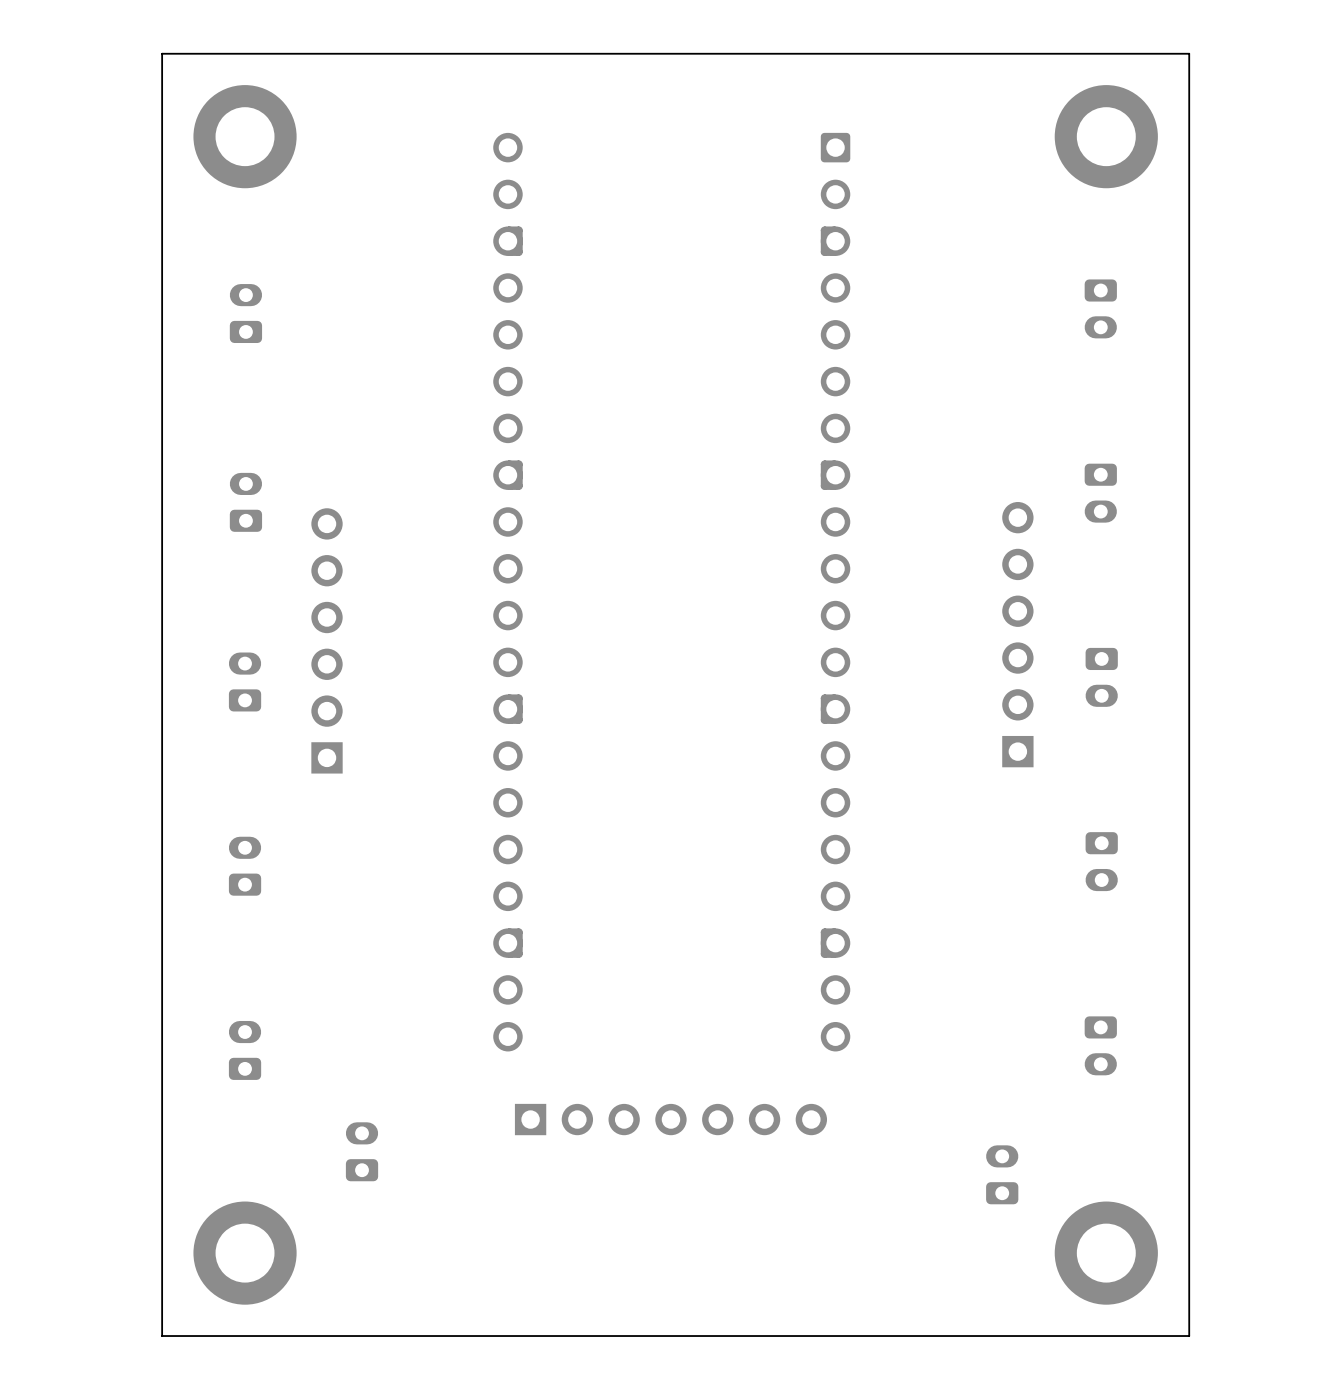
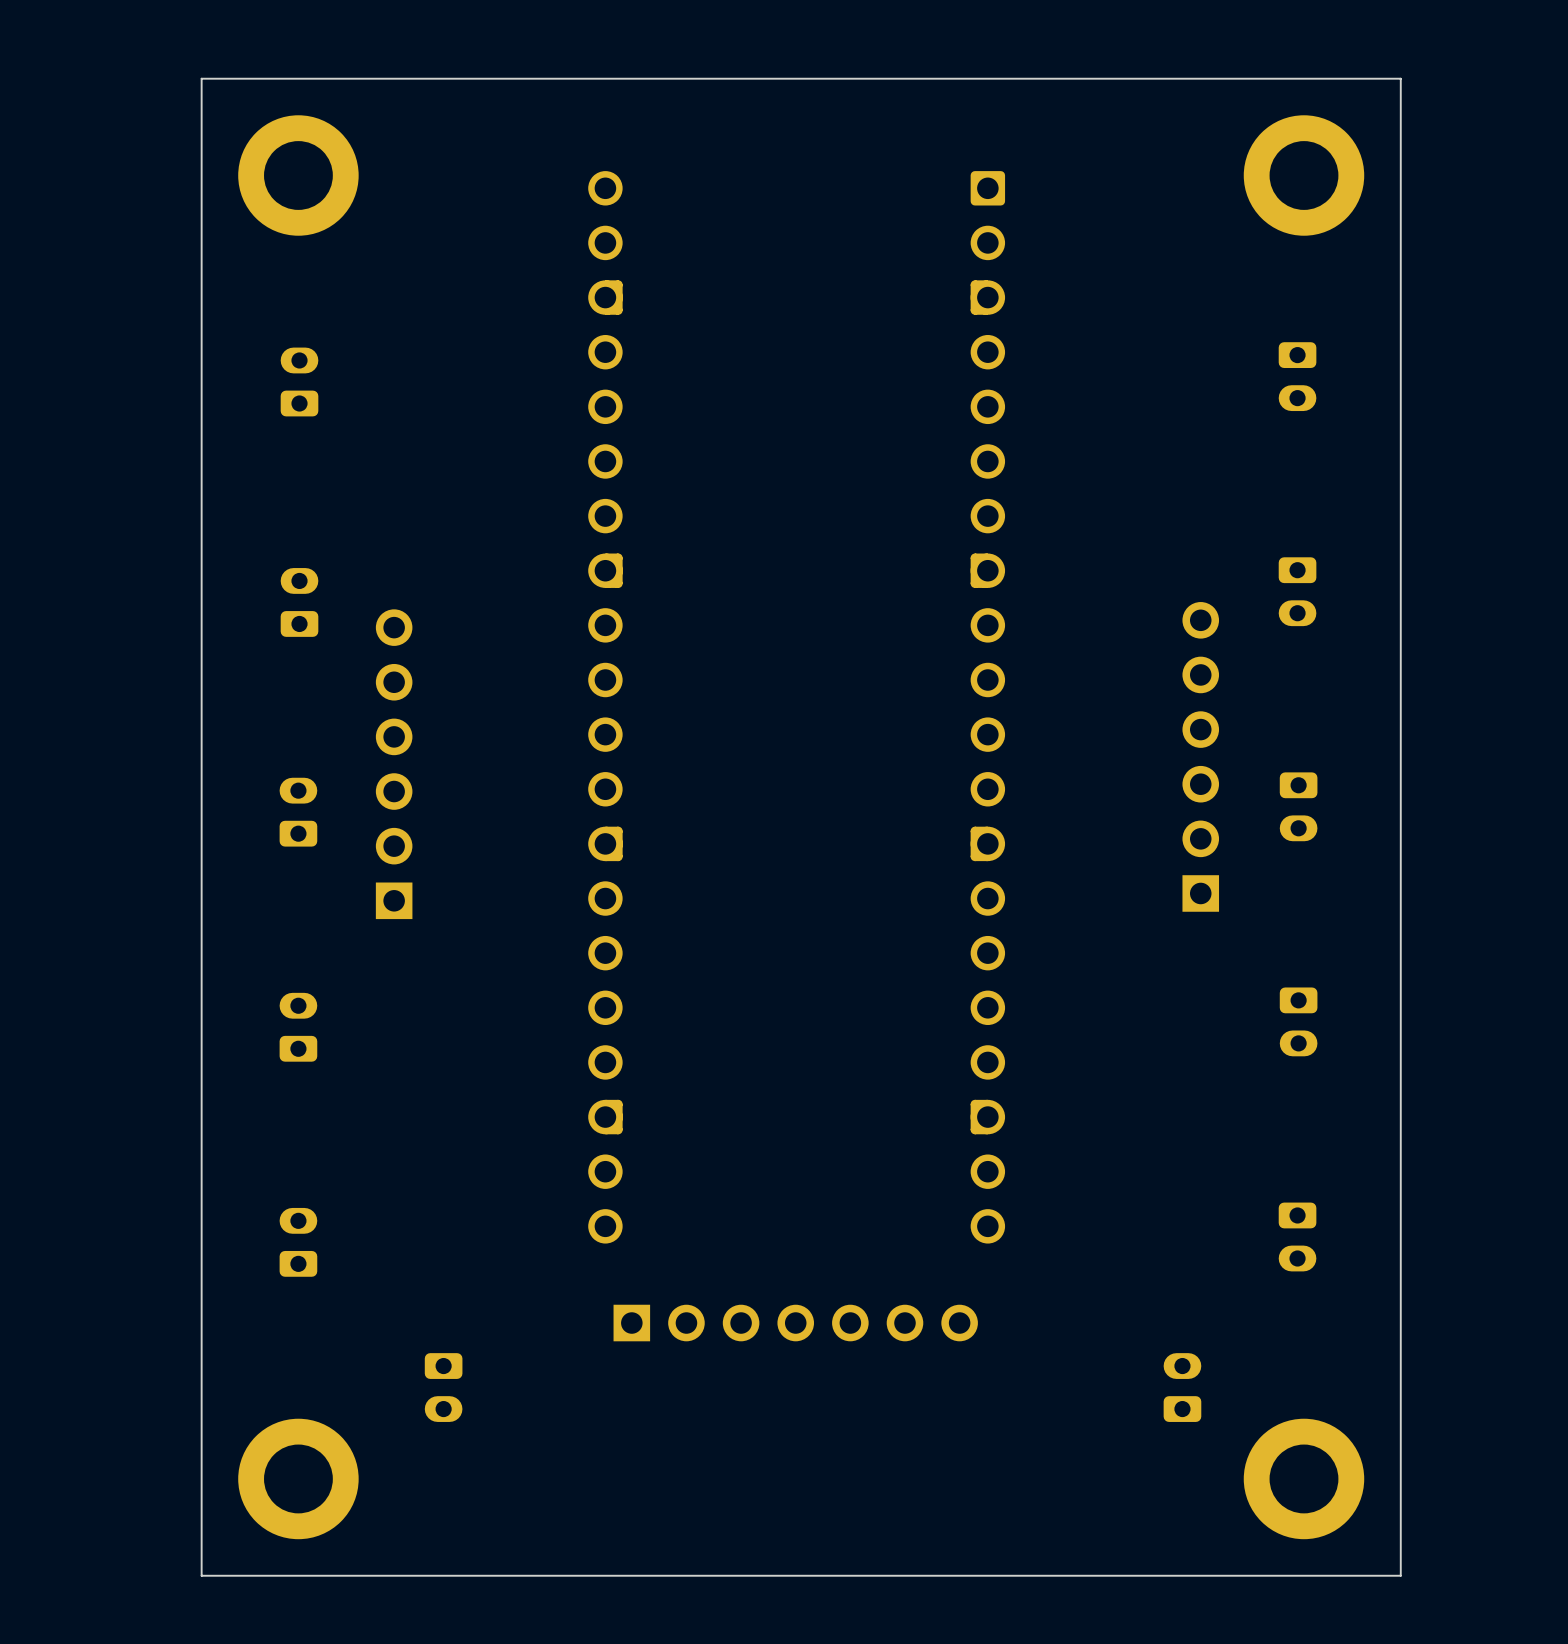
part rotation: 0° (362, 1151) -> 180° (443, 1387)

